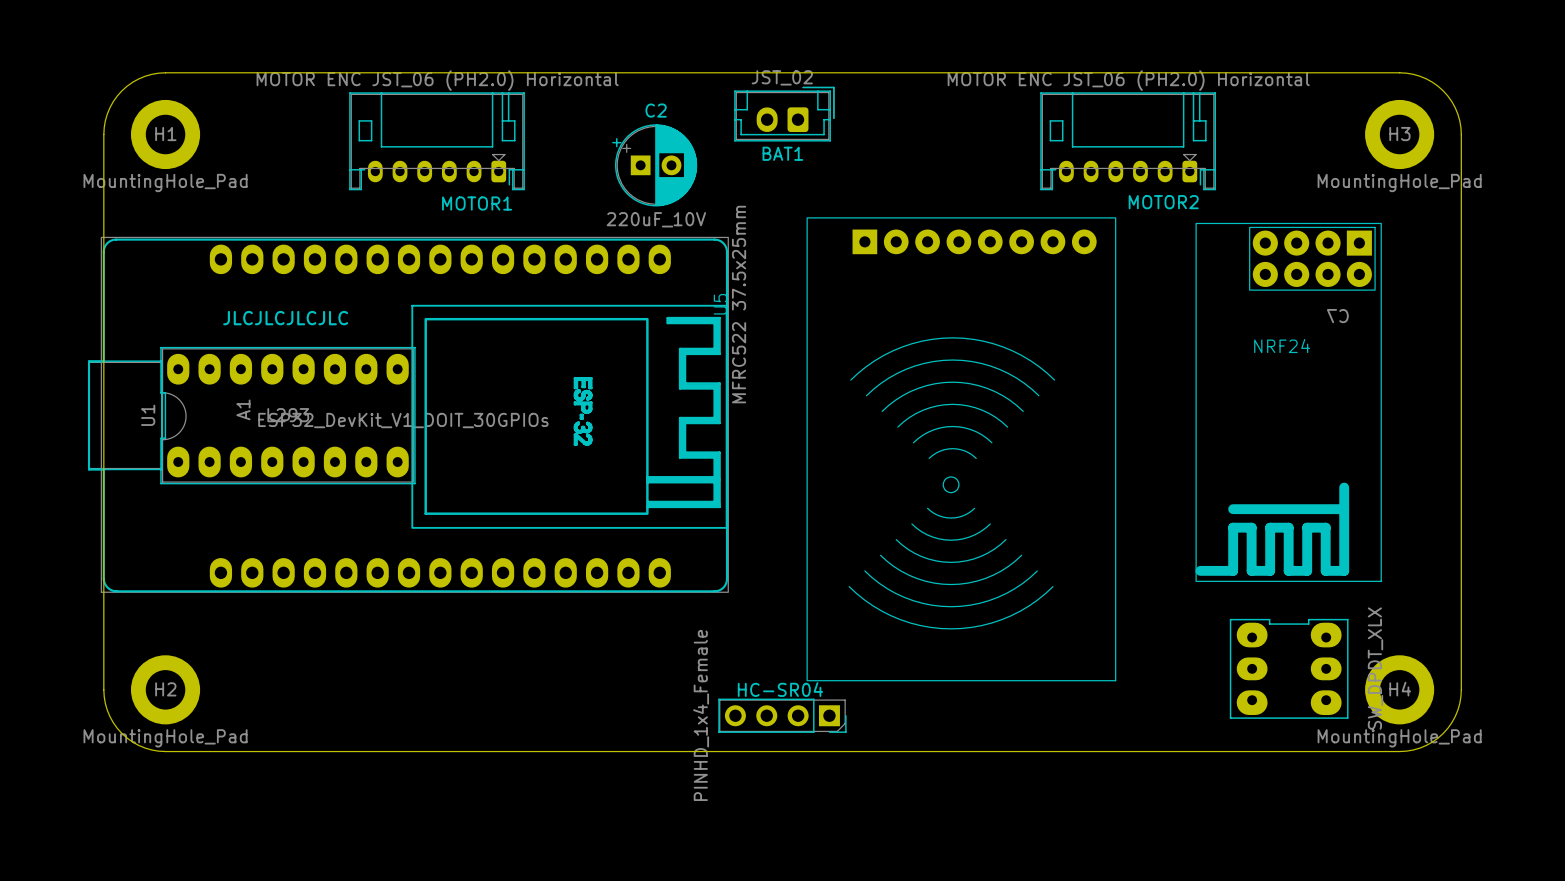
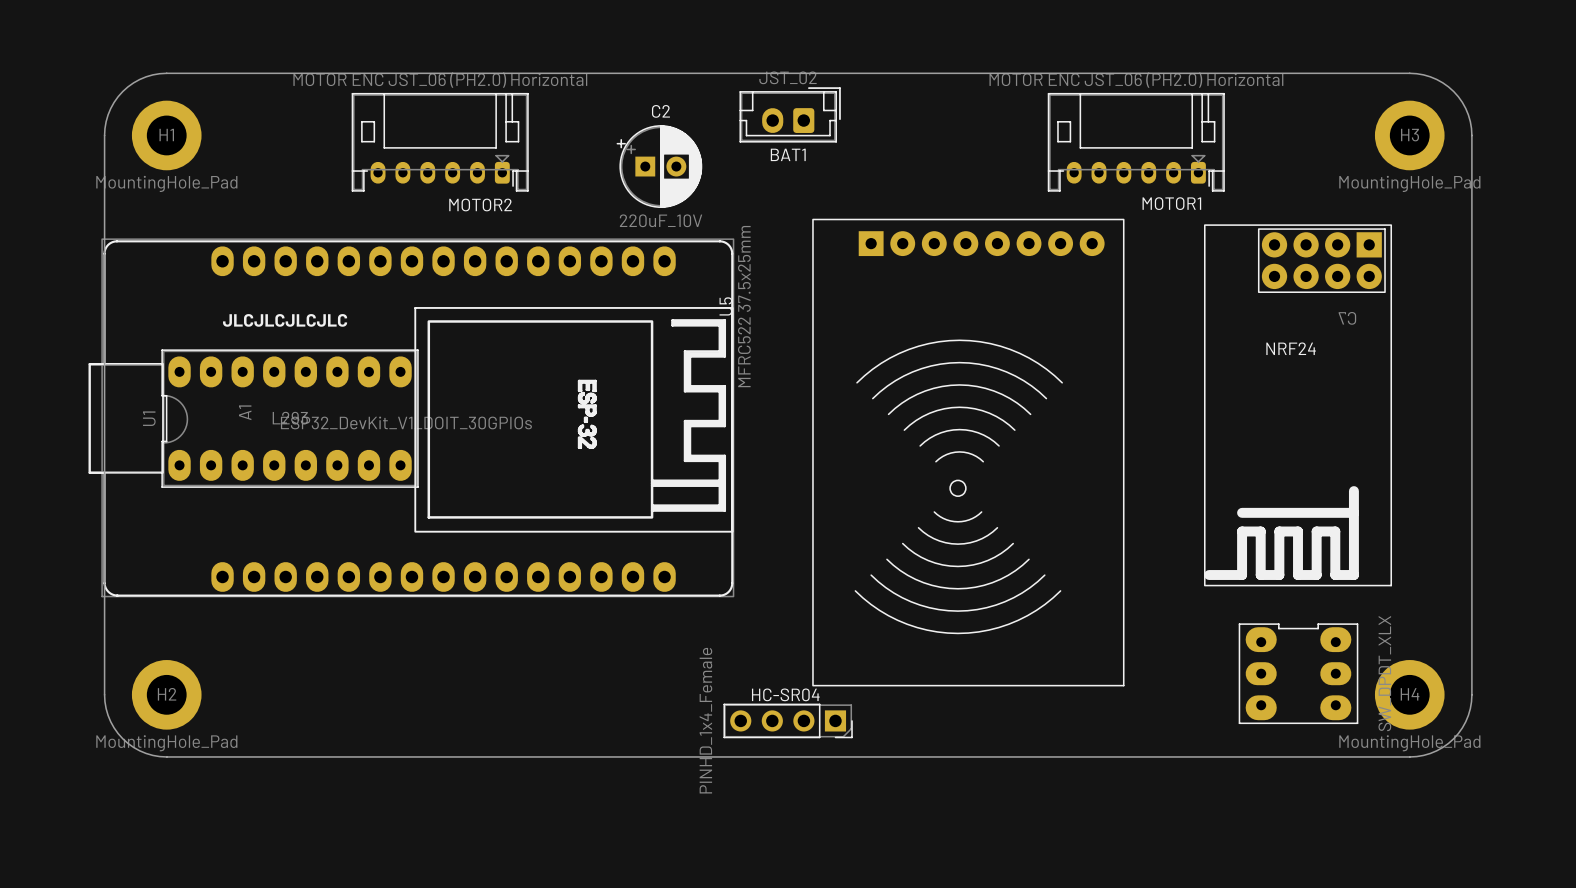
MOTOR2 name: MOTOR2 (1163, 202) -> MOTOR1 (1171, 203)
MOTOR1 name: MOTOR1 (477, 203) -> MOTOR2 (480, 204)

